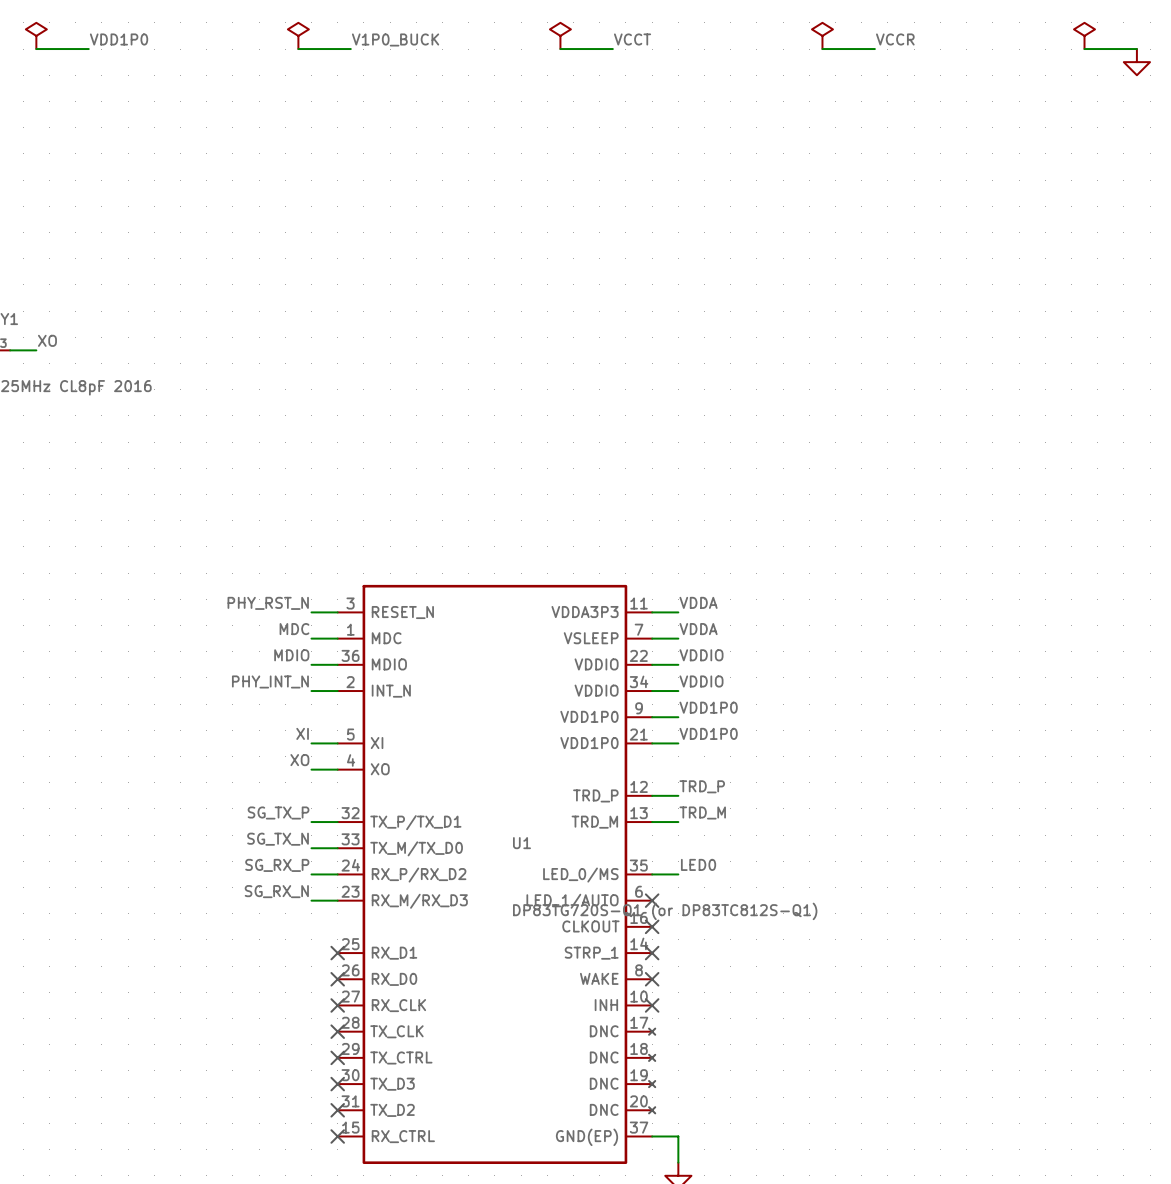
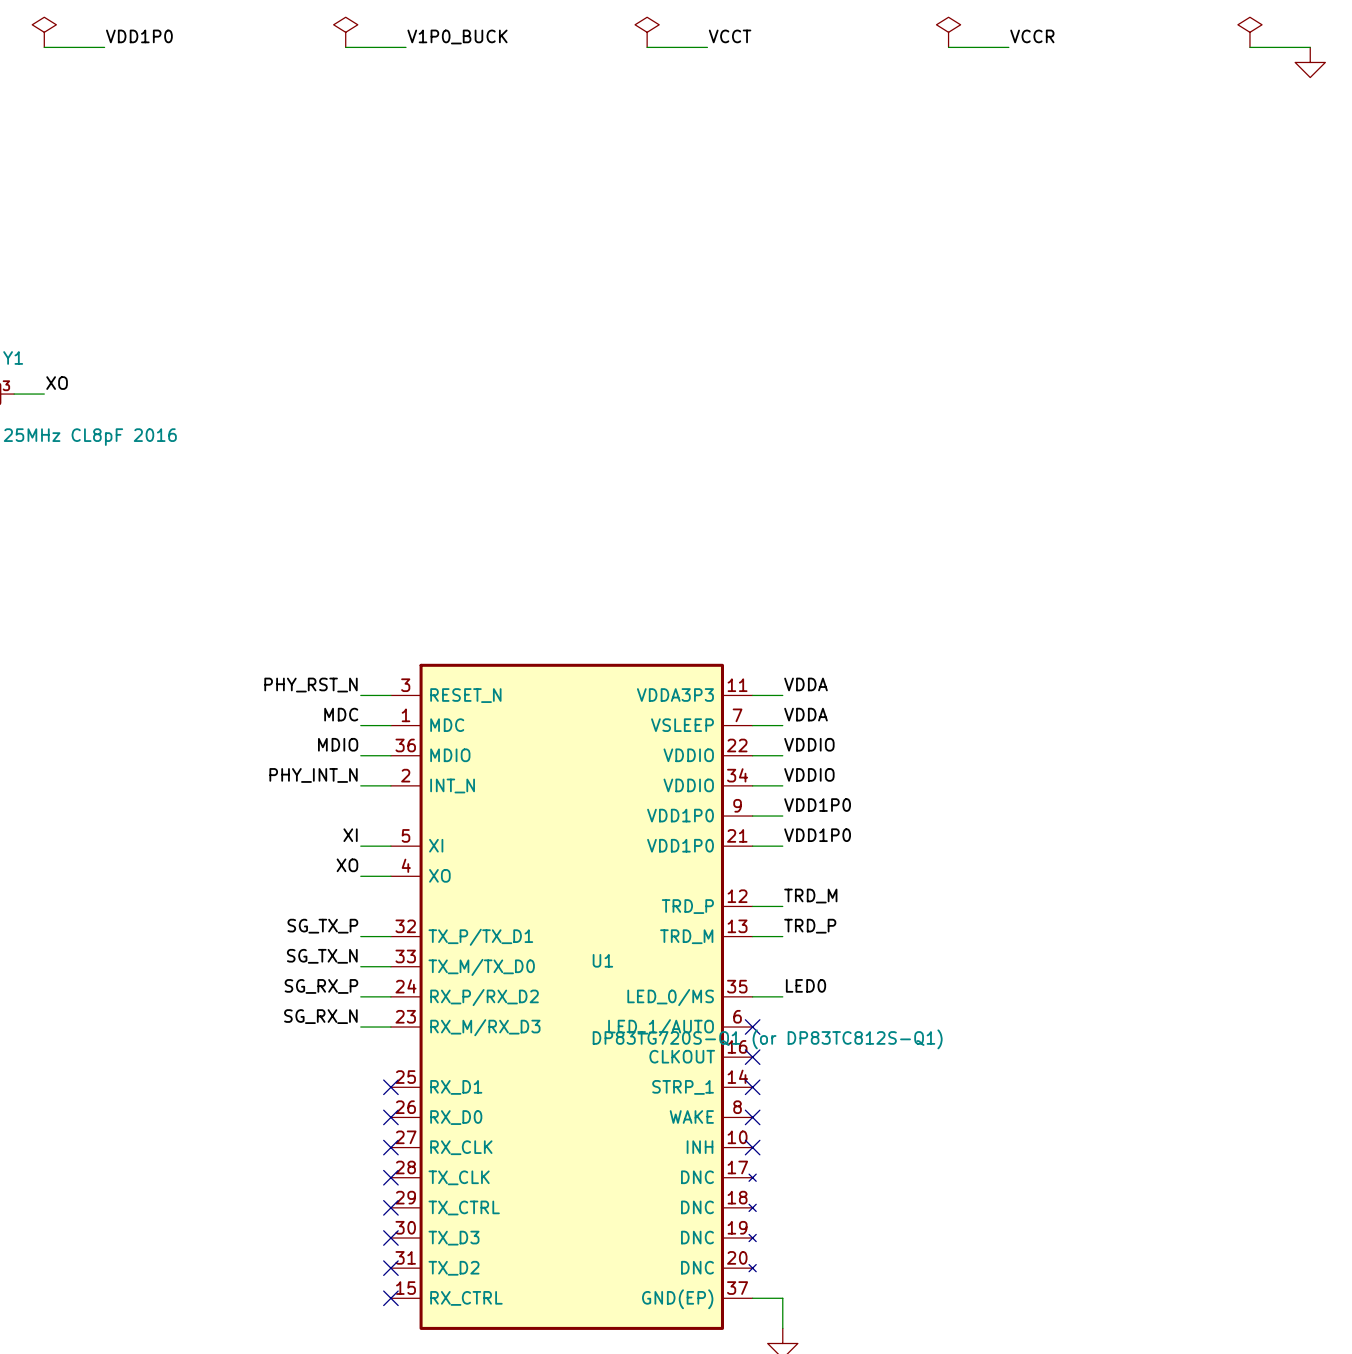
label: TRD_P (702, 786) -> TRD_M (810, 896)
label: TRD_M (702, 812) -> TRD_P (810, 926)

